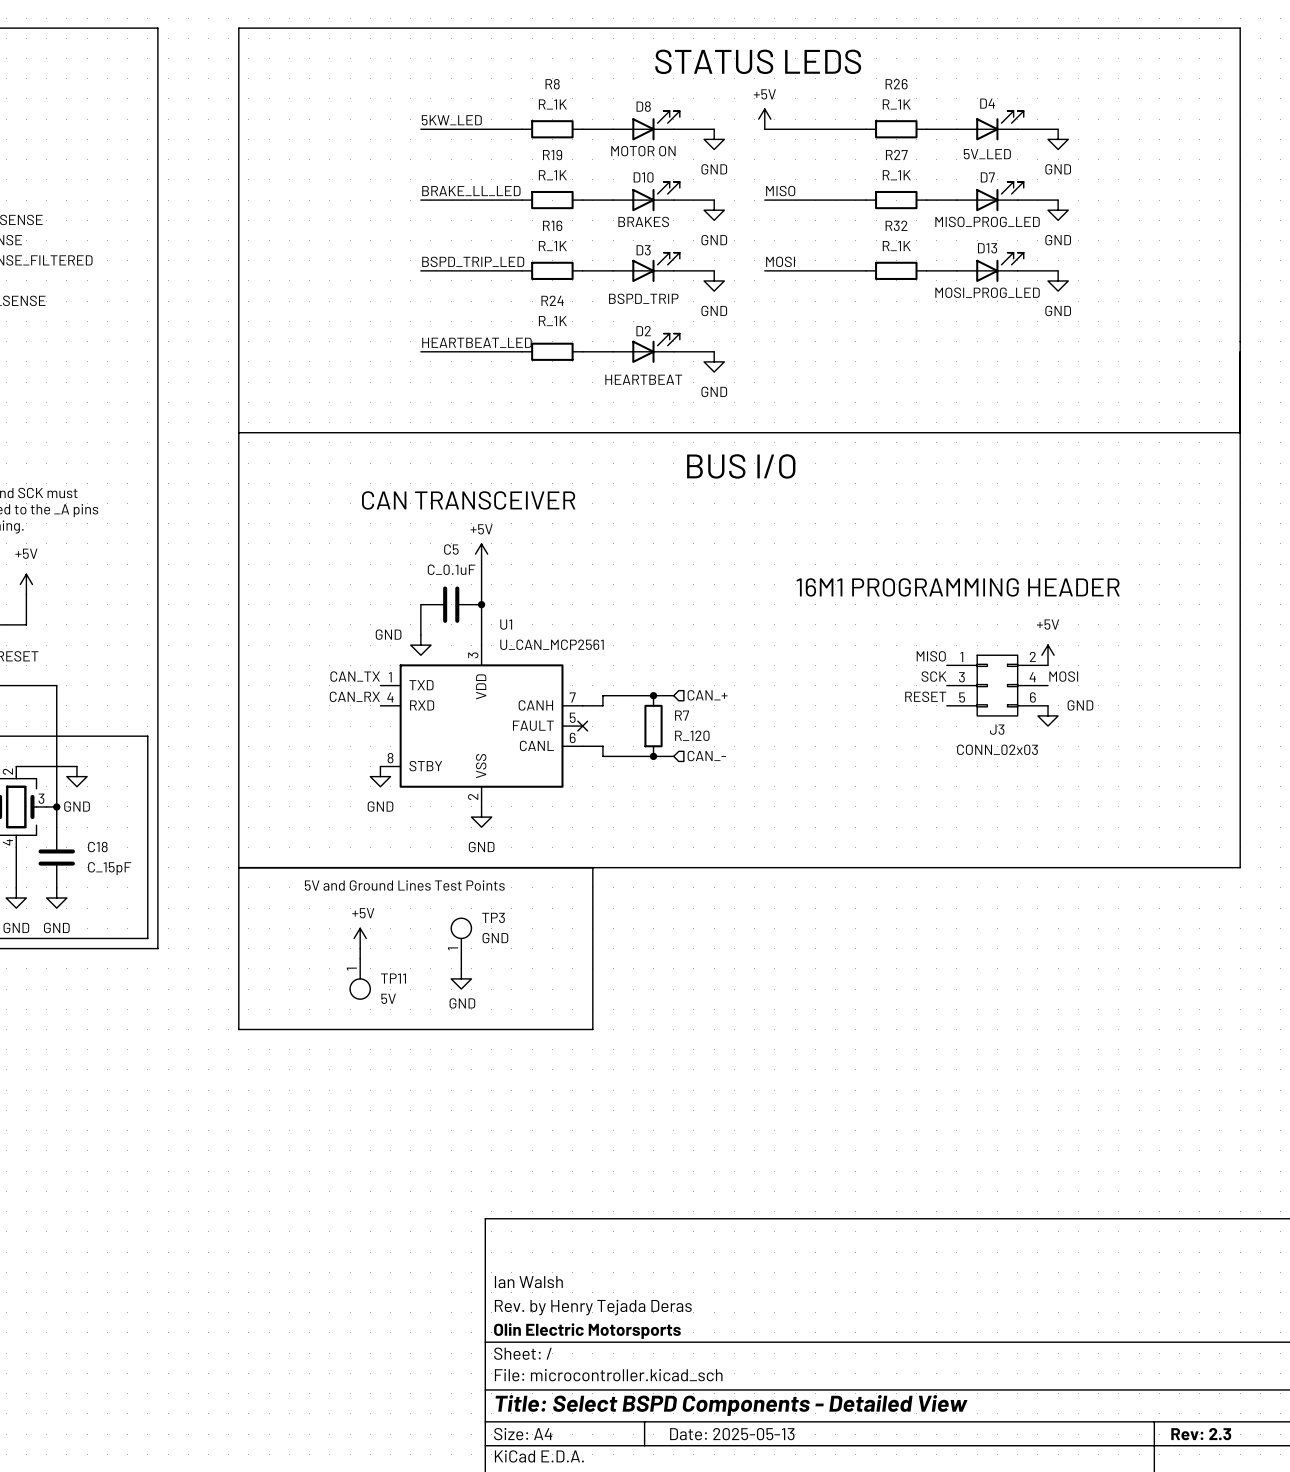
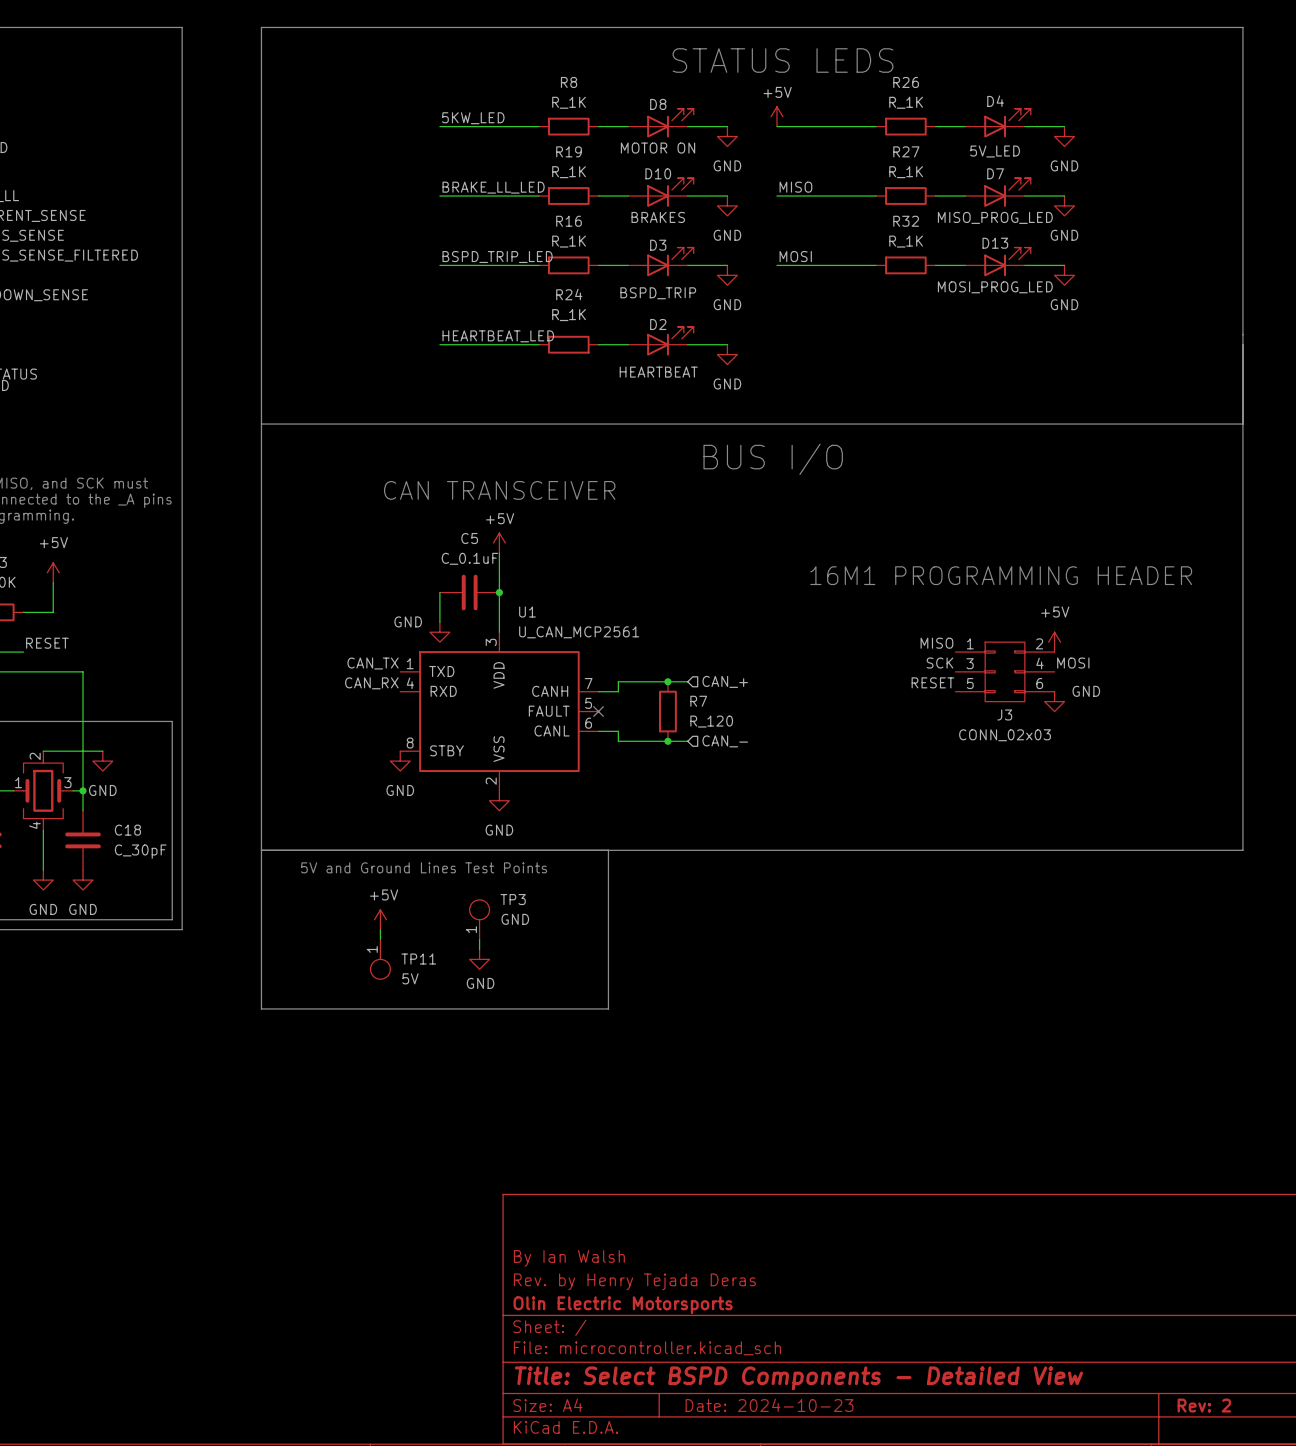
C18 value: C_15pF (109, 868) -> C_30pF (140, 851)
title block: Ian Walsh (528, 1282) -> By Ian Walsh (569, 1258)
title block: Date: 2025-05-13 (732, 1434) -> Date: 2024-10-23 (769, 1405)
title block: Rev: 2.3 (1201, 1434) -> Rev: 2 (1204, 1405)

